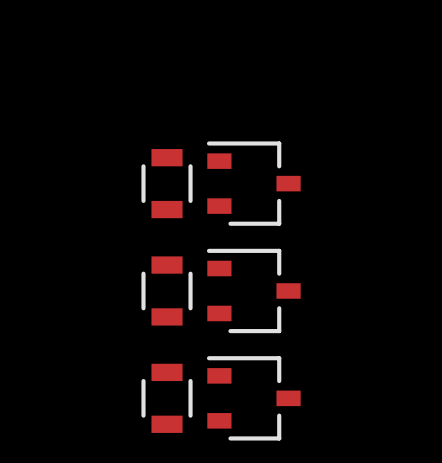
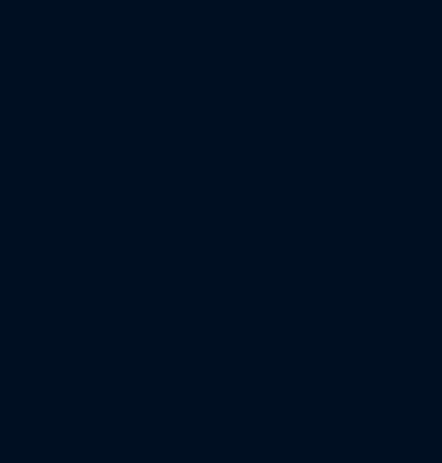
part: (167, 183) -> none
part: (253, 183) -> none
part: (167, 290) -> none
part: (253, 290) -> none
part: (167, 398) -> none
part: (253, 398) -> none

